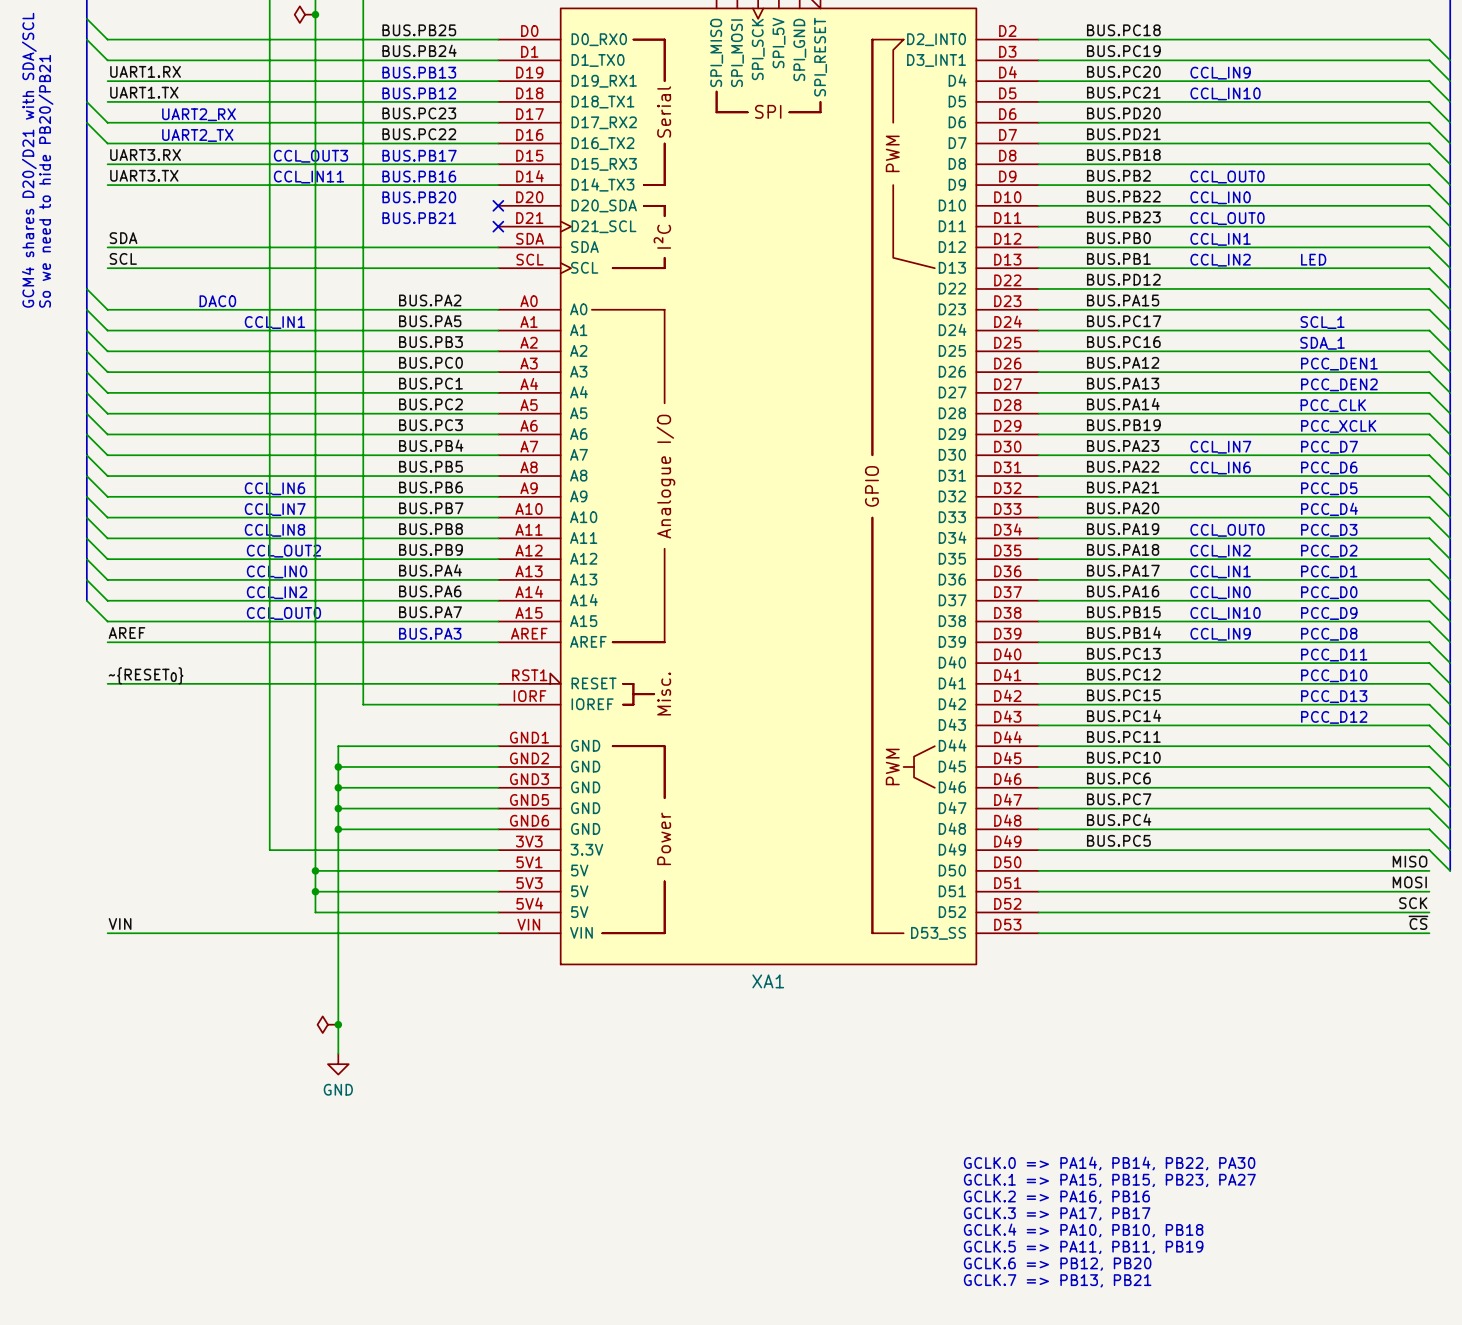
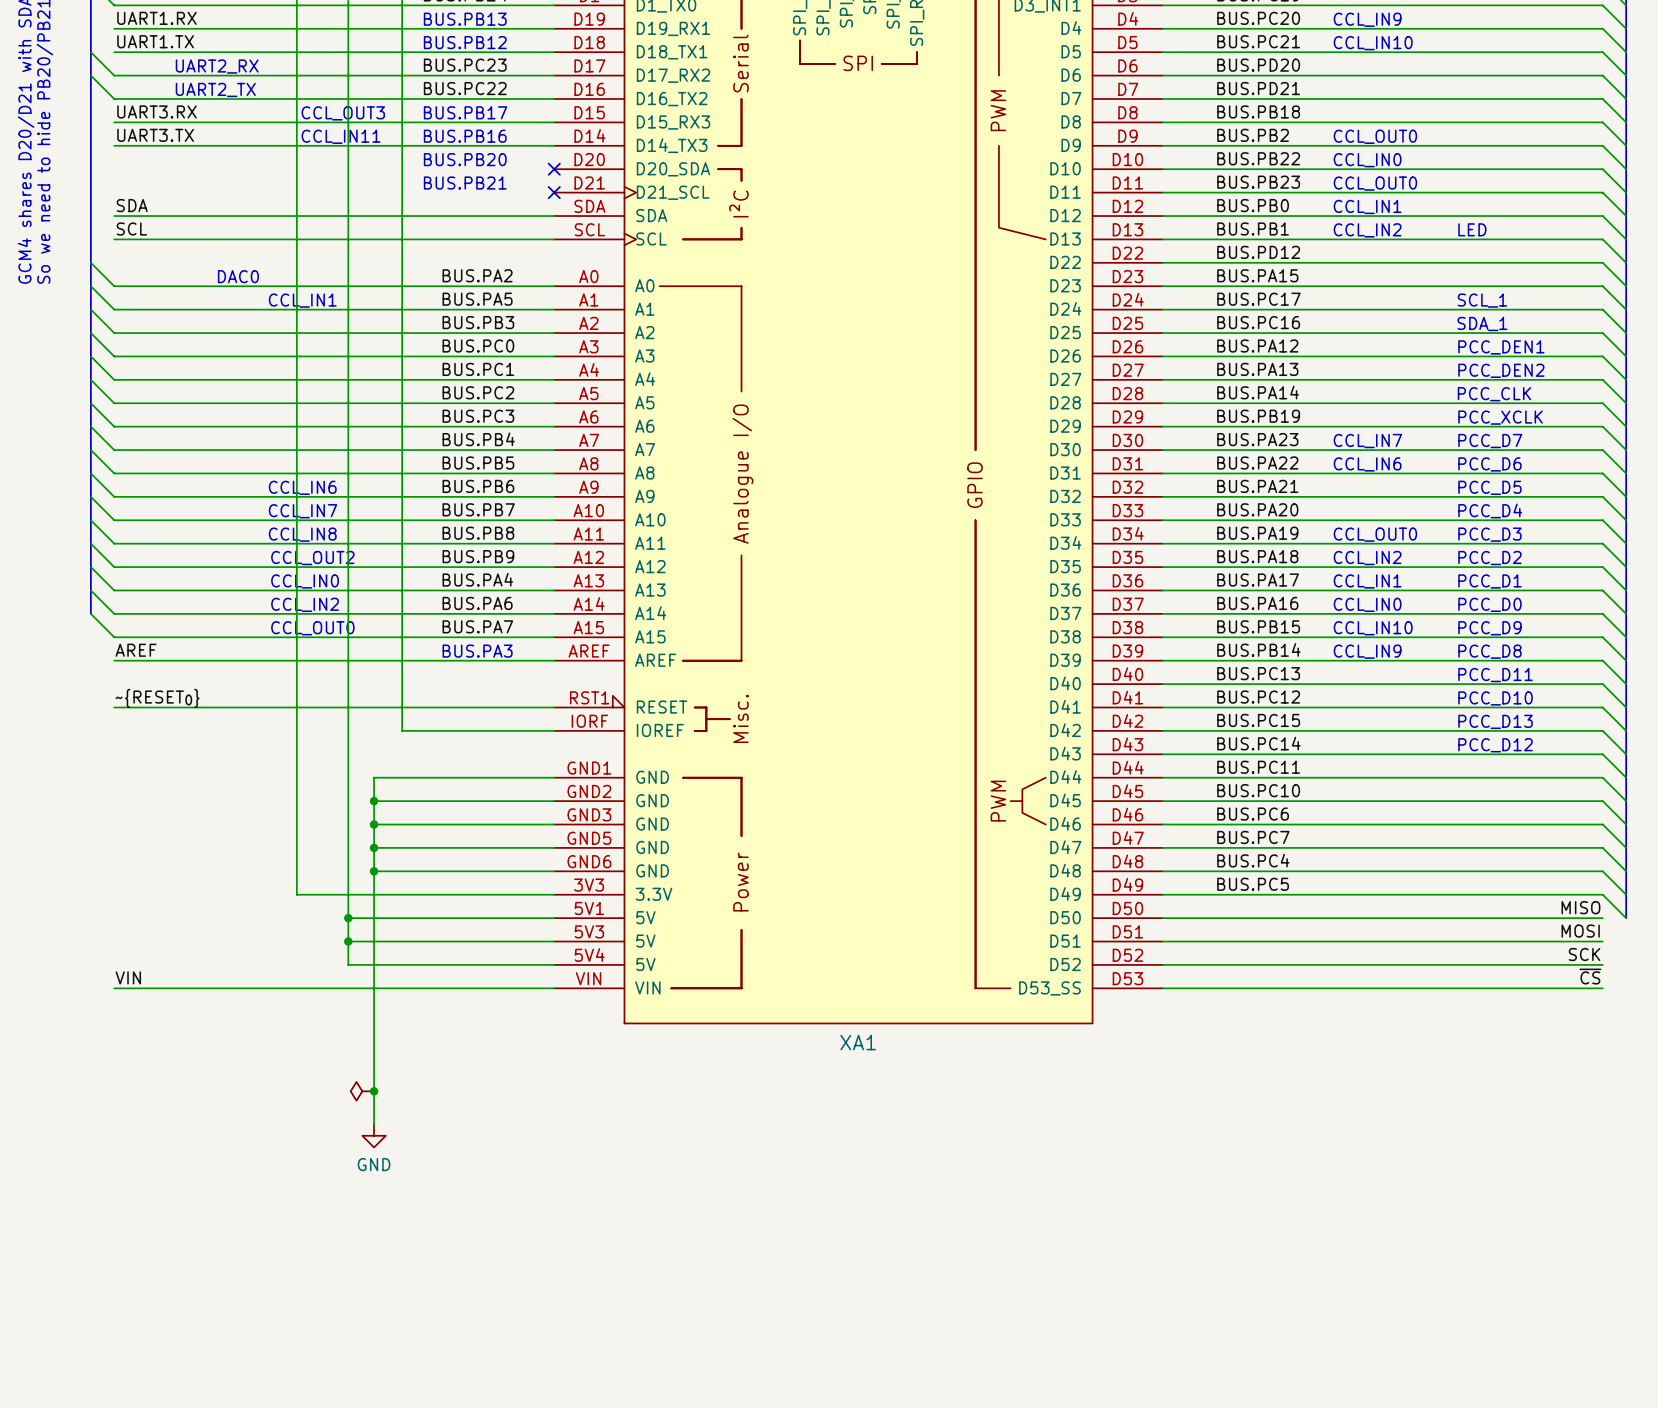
text: GCLK.0 => PA14, PB14, PB22, PA30 (1109, 1163) -> none
text: GCLK.1 => PA15, PB15, PB23, PA27 (1109, 1180) -> none
text: GCLK.2 => PA16, PB16 (1056, 1197) -> none
text: GCLK.3 => PA17, PB17 (1057, 1213) -> none
text: GCLK.4 => PA10, PB10, PB18 (1083, 1230) -> none
text: GCLK.5 => PA11, PB11, PB19 (1083, 1247) -> none
text: GCLK.6 => PB12, PB20 (1057, 1264) -> none
text: GCLK.7 => PB13, PB21 (1057, 1280) -> none

